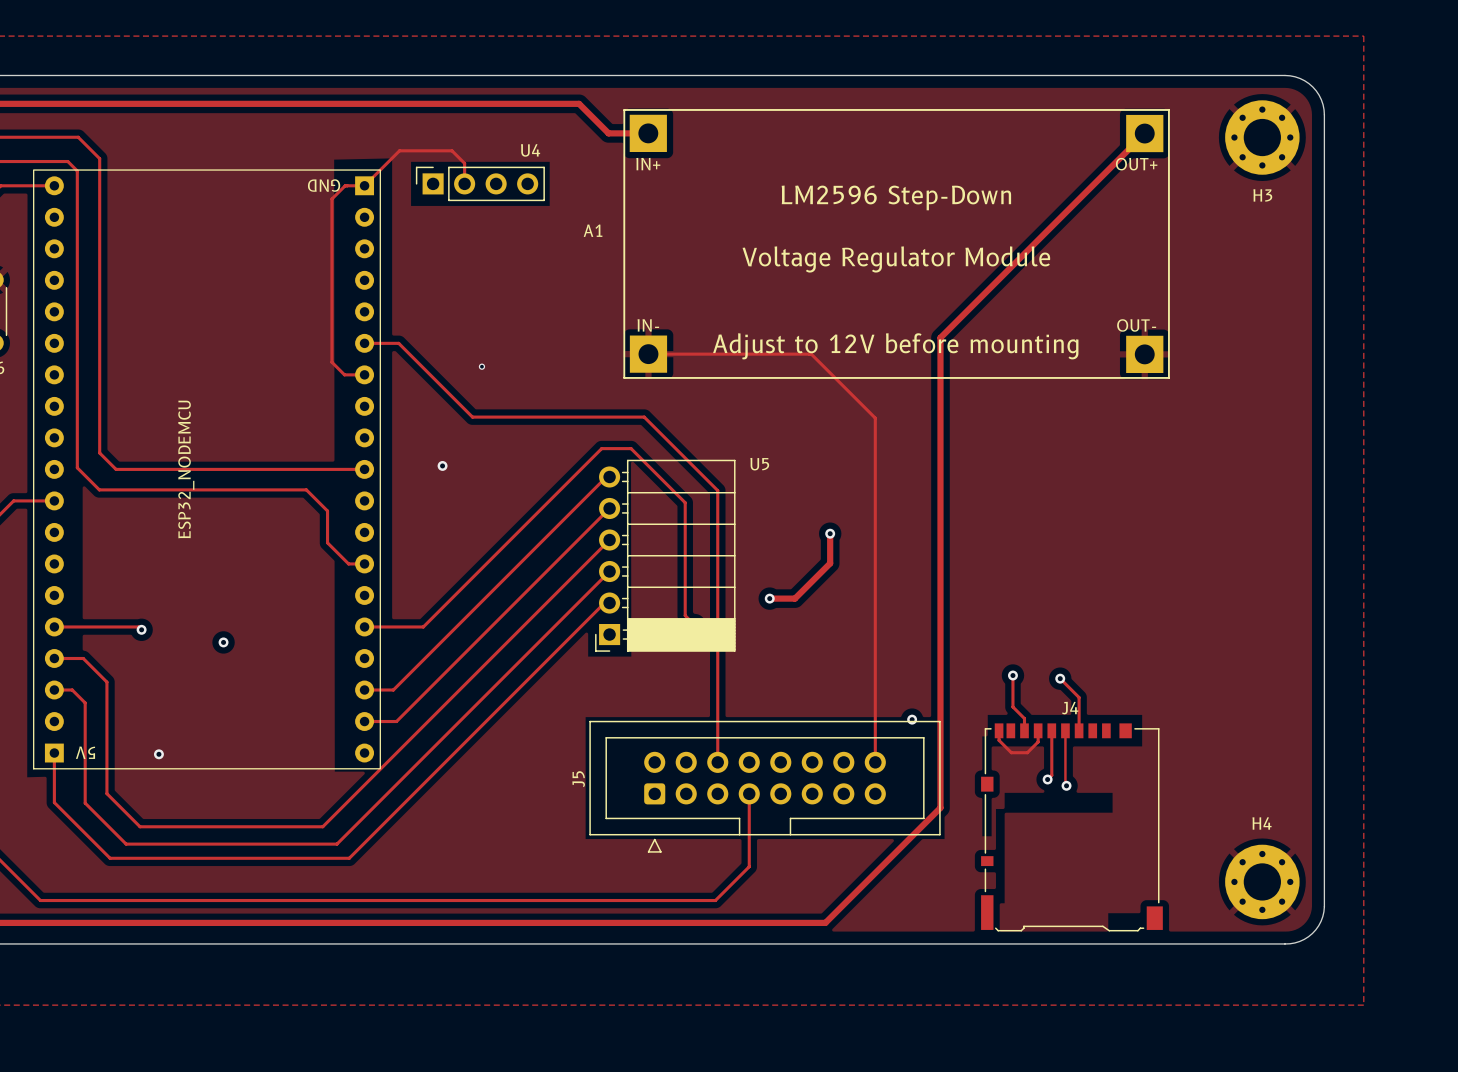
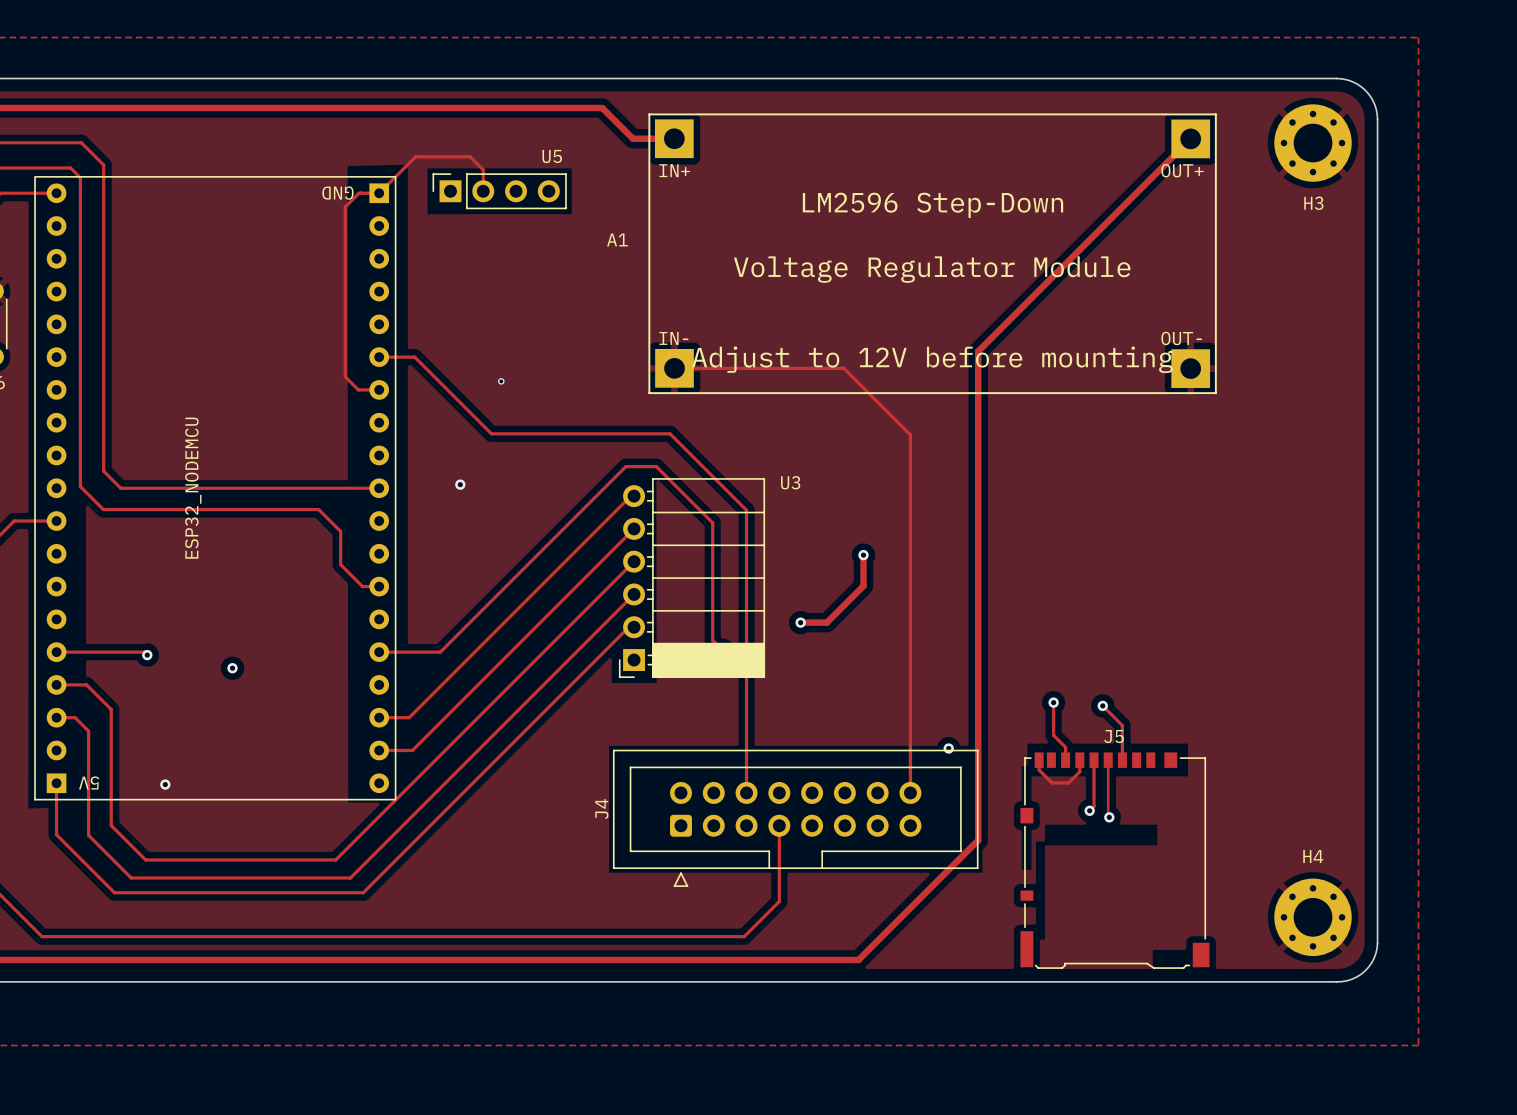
U4 name: U4 (530, 150) -> U5 (552, 156)
U5 name: U5 (759, 464) -> U3 (790, 482)
J4 name: J4 (1070, 708) -> J5 (1114, 736)
J5 name: J5 (578, 779) -> J4 (601, 809)

